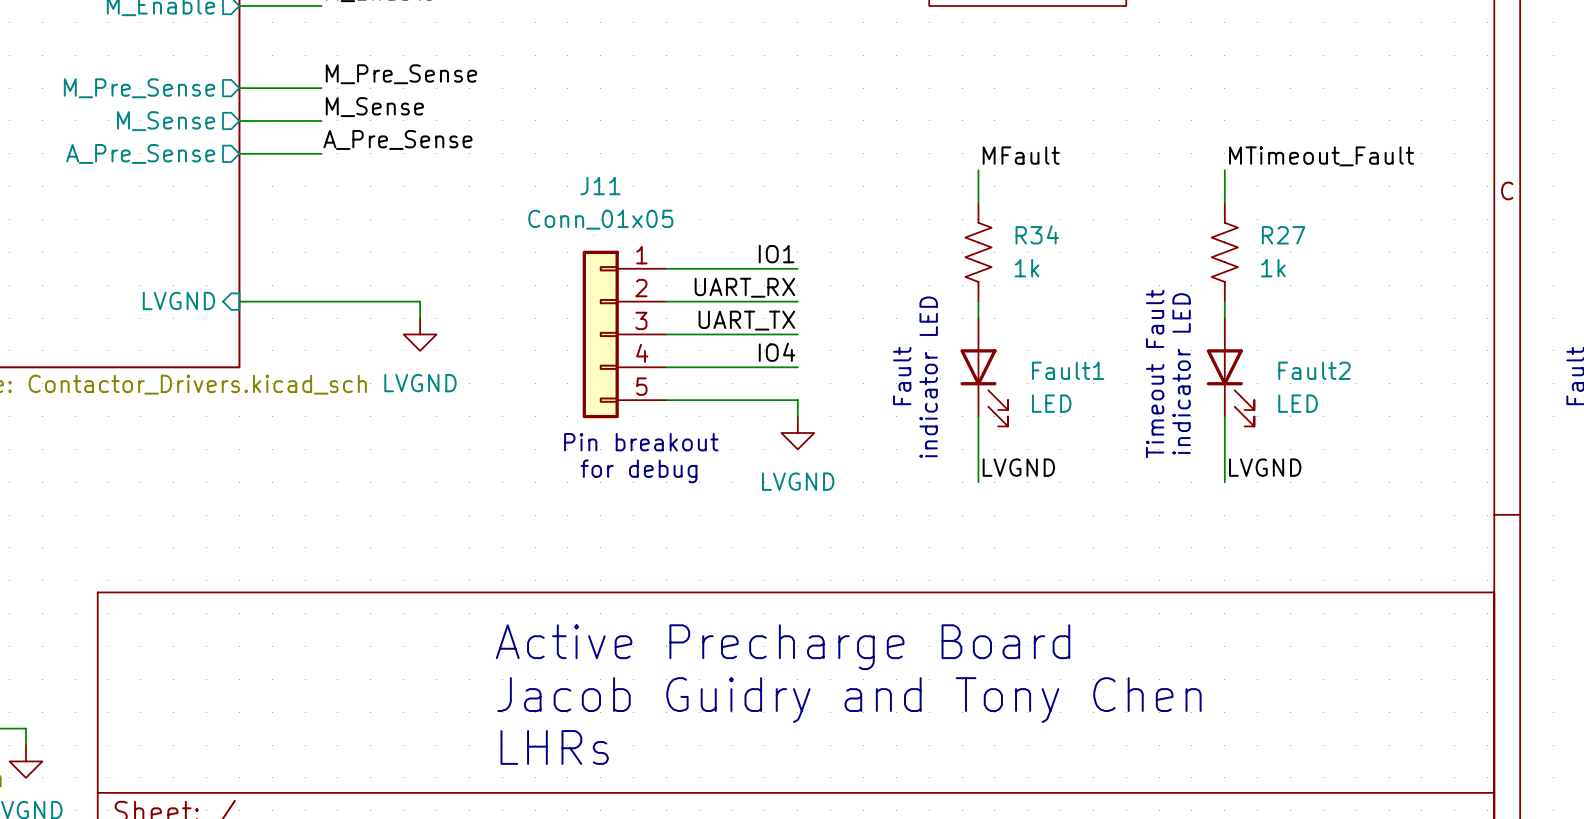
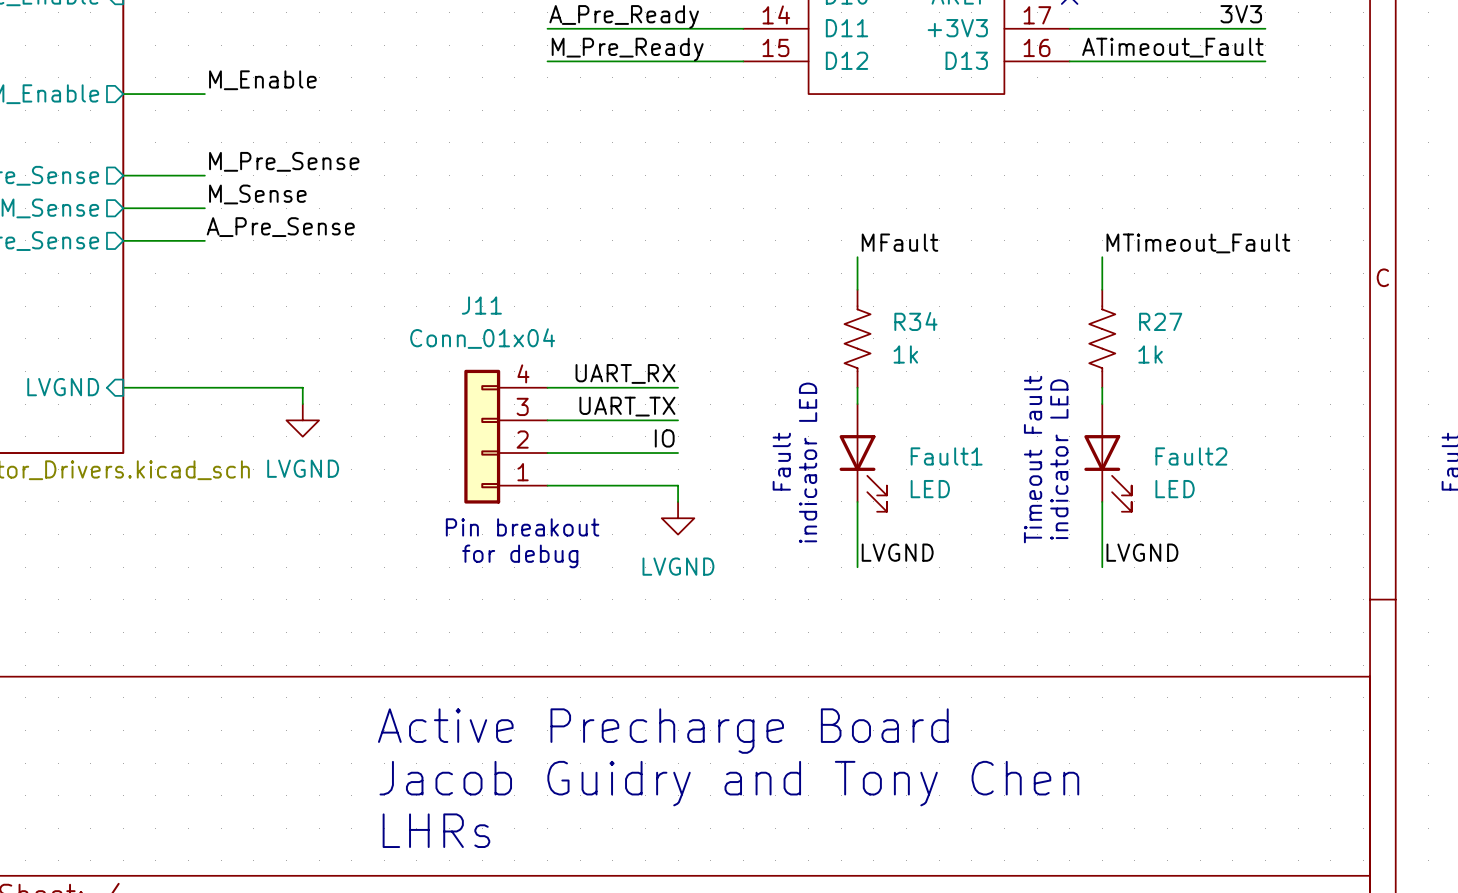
J11 value: Conn_01x05 (600, 219) -> Conn_01x04 (482, 338)
J11 symbol: [582, 250, 667, 419] -> [464, 369, 548, 504]
label: IO1 (776, 254) -> none
wire: (666, 268) (797, 268) -> none
label: IO4 (776, 352) -> IO (664, 438)

